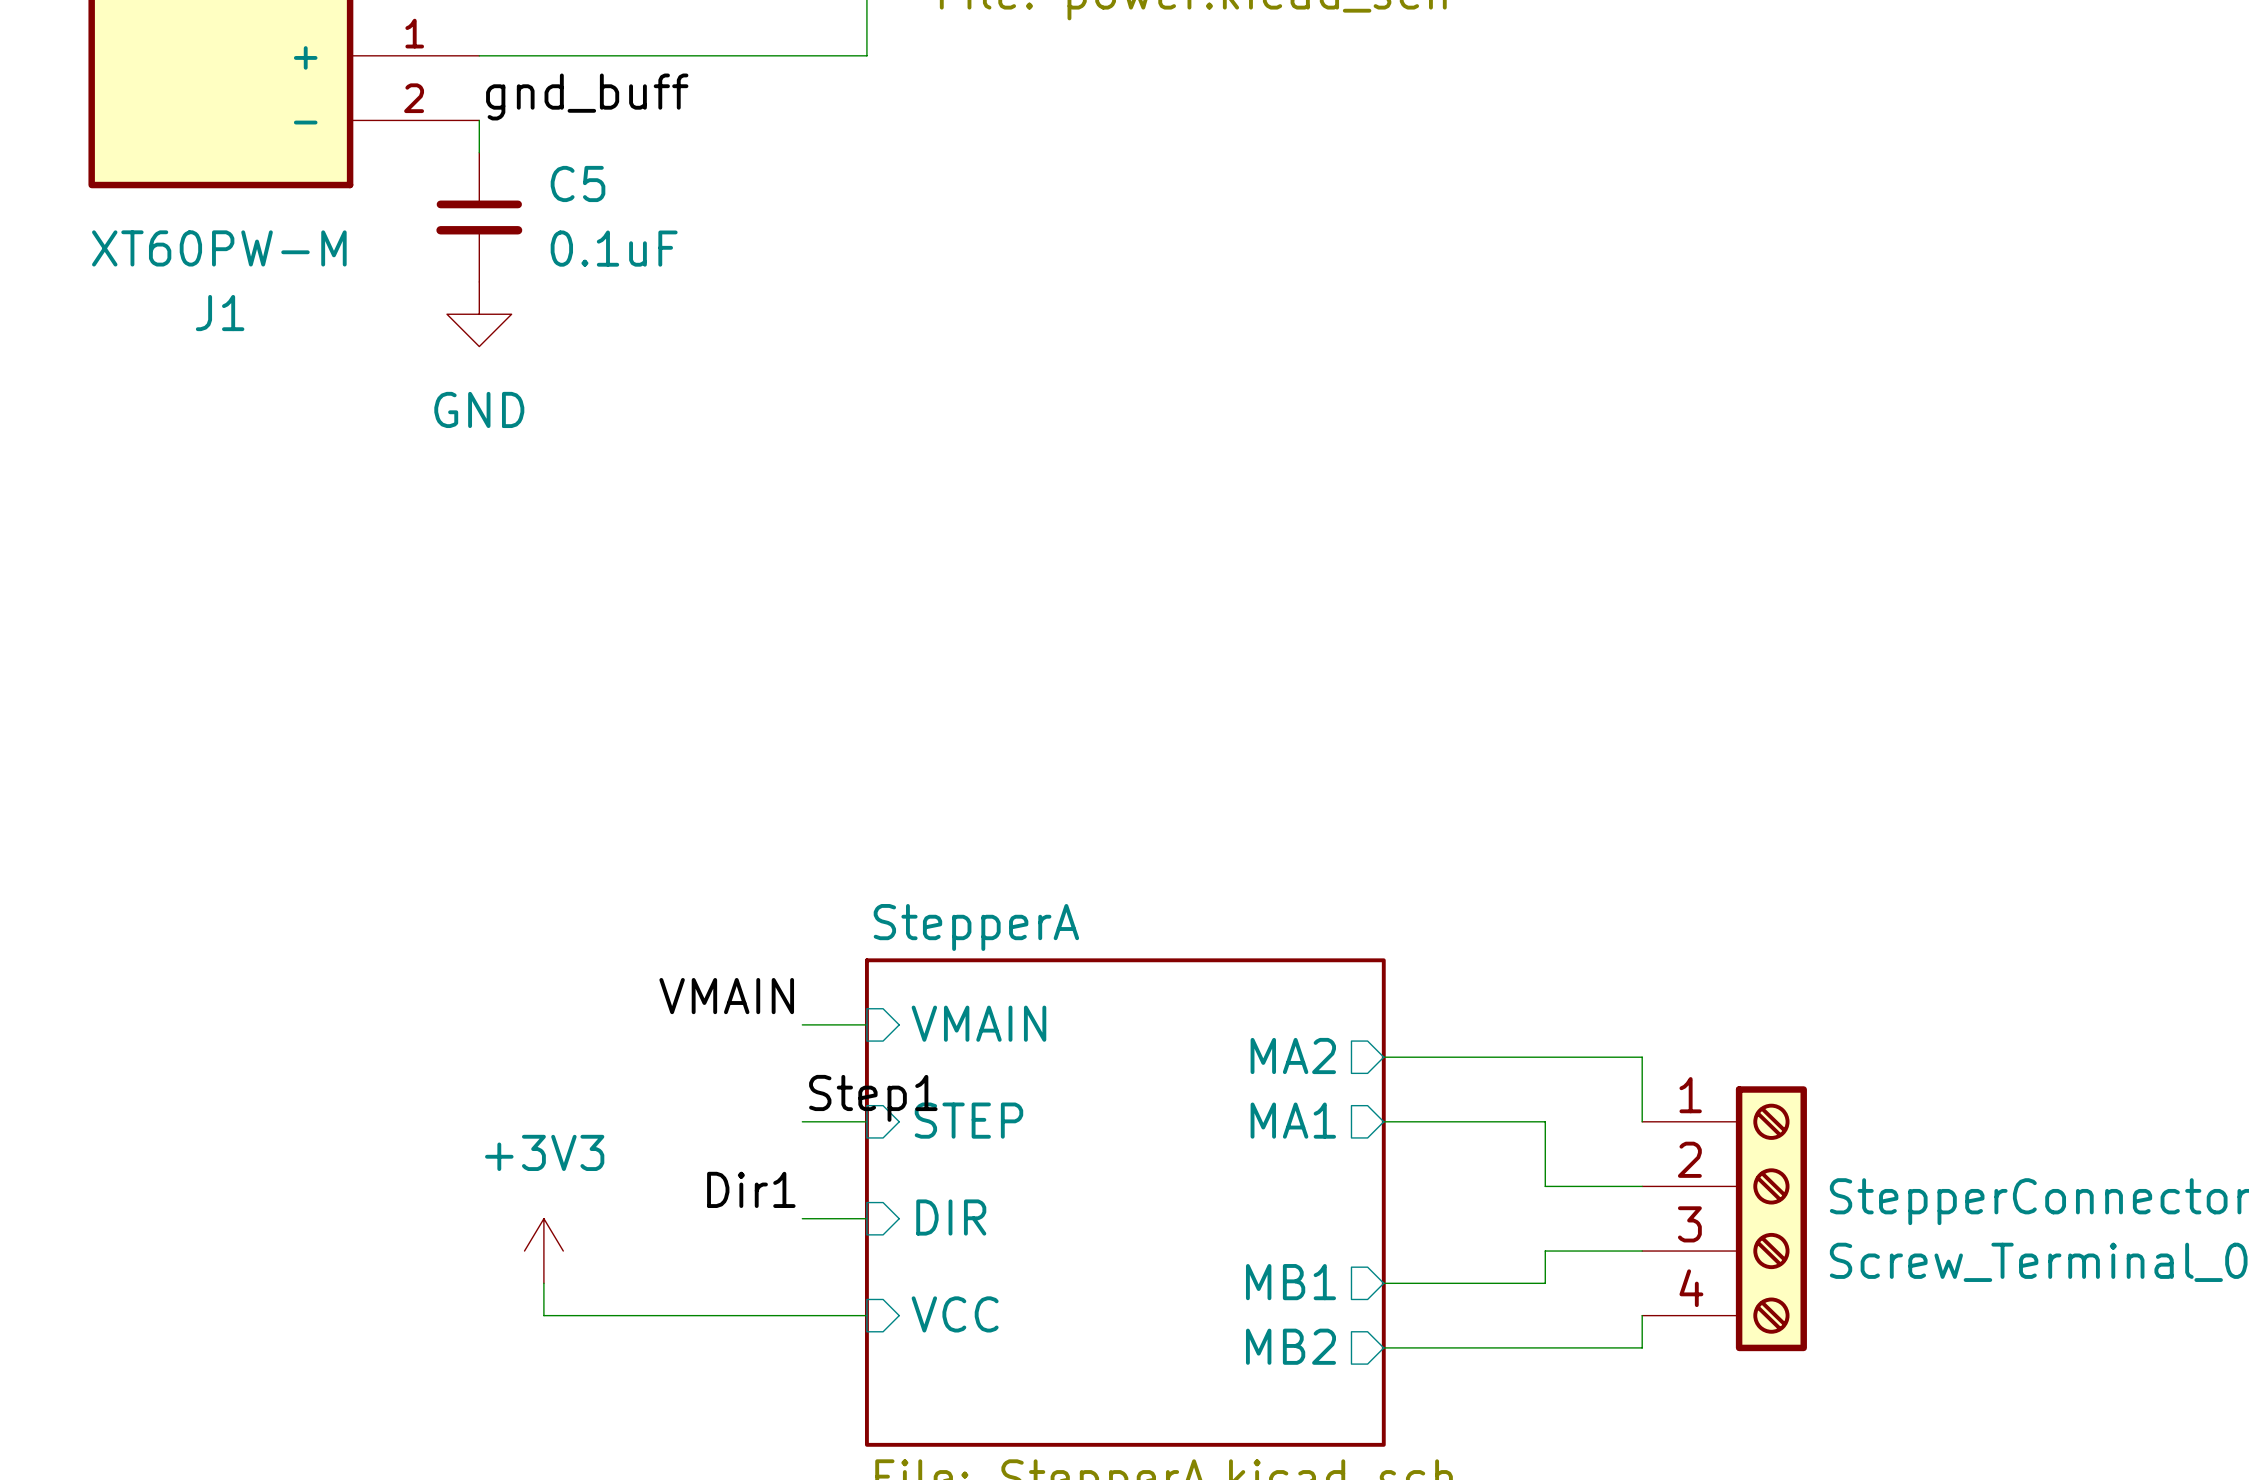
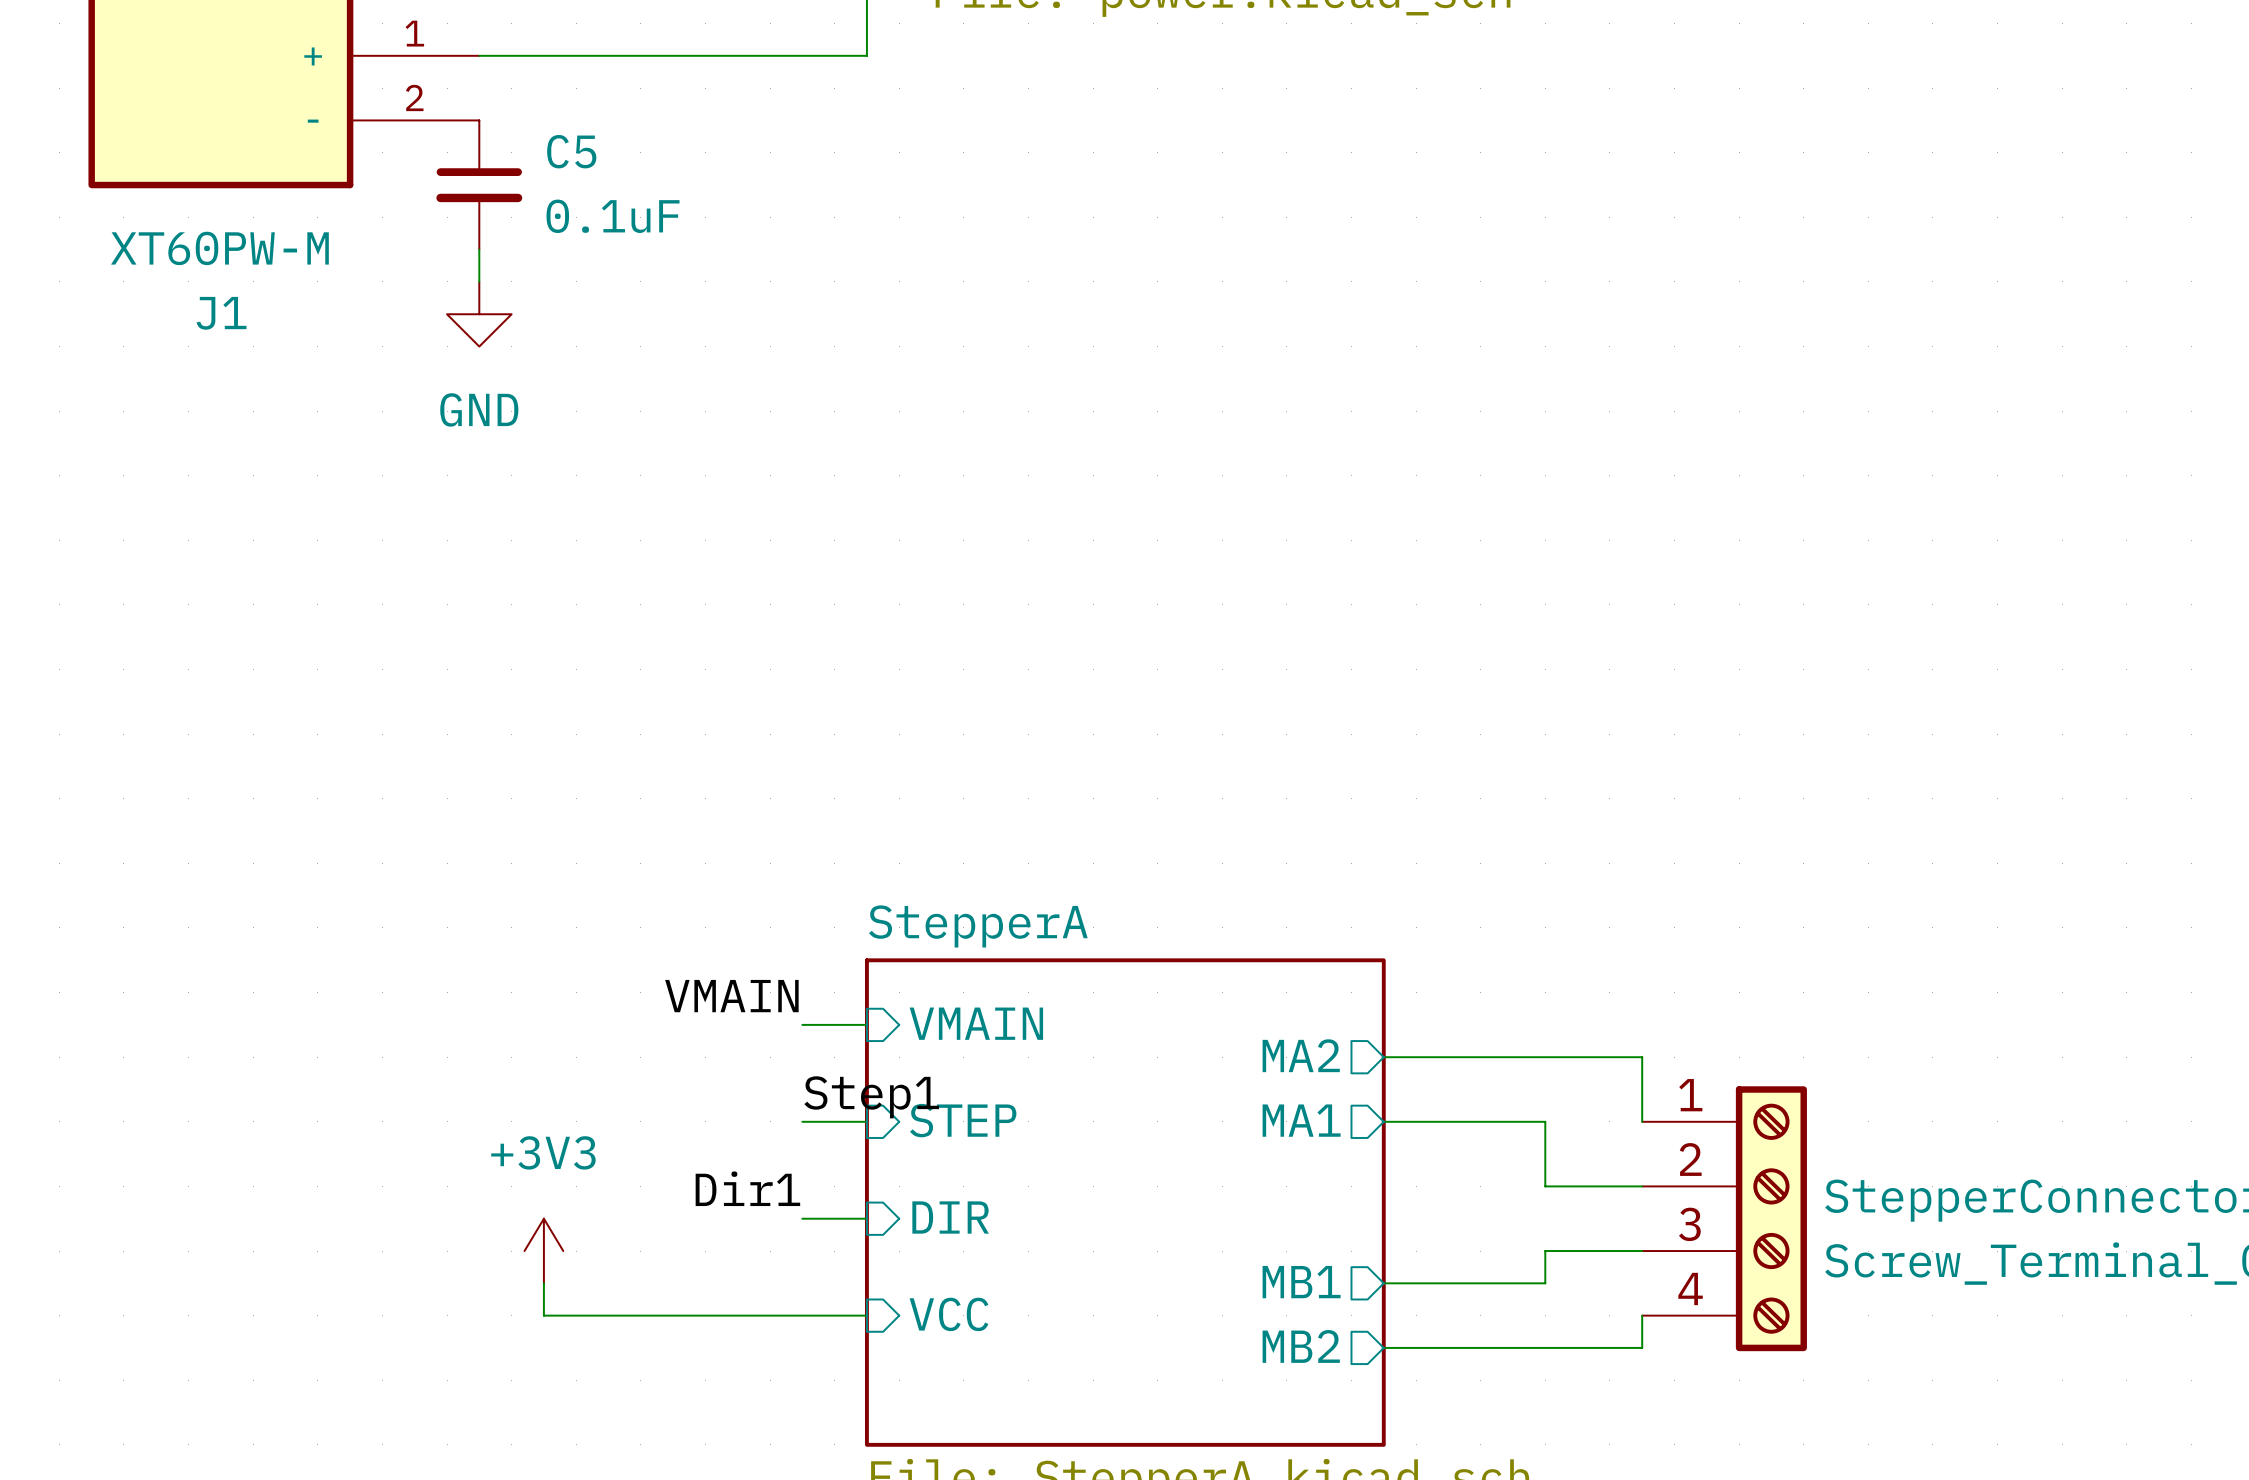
label: gnd_buff (587, 96) -> none
C5 position: (479, 217) -> (479, 185)

